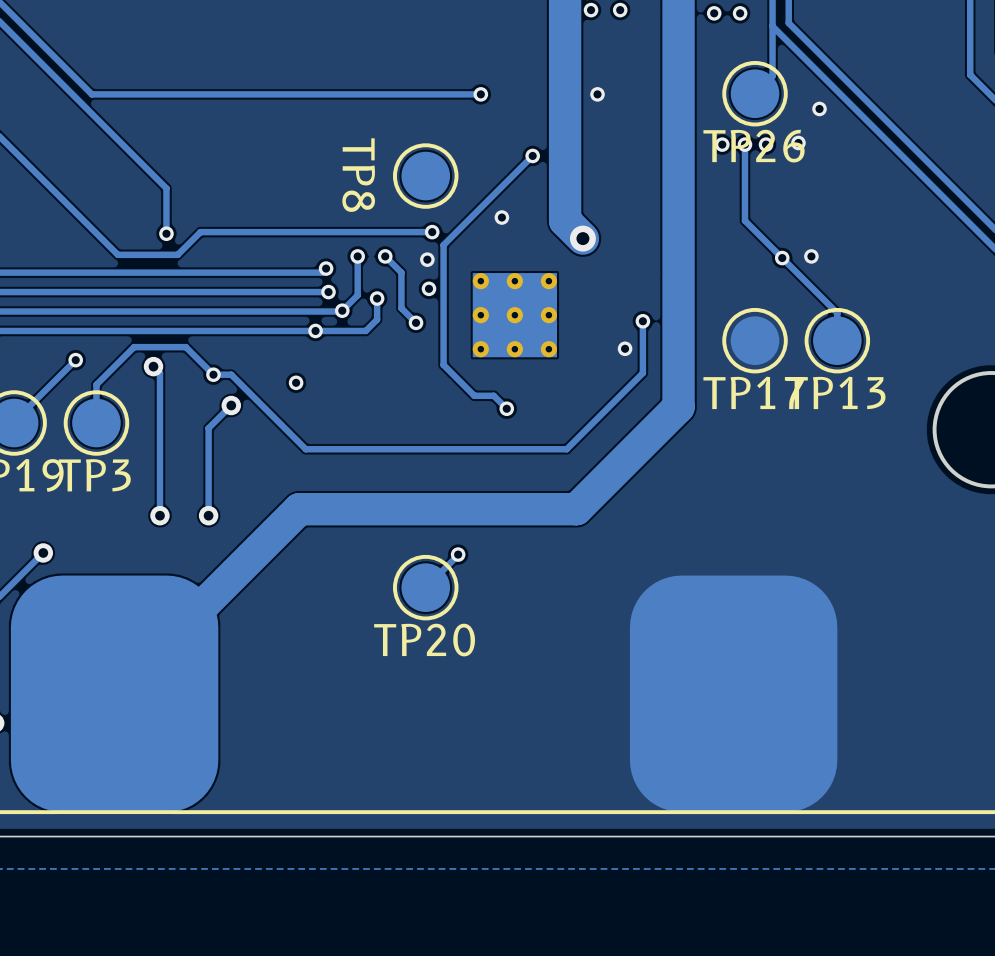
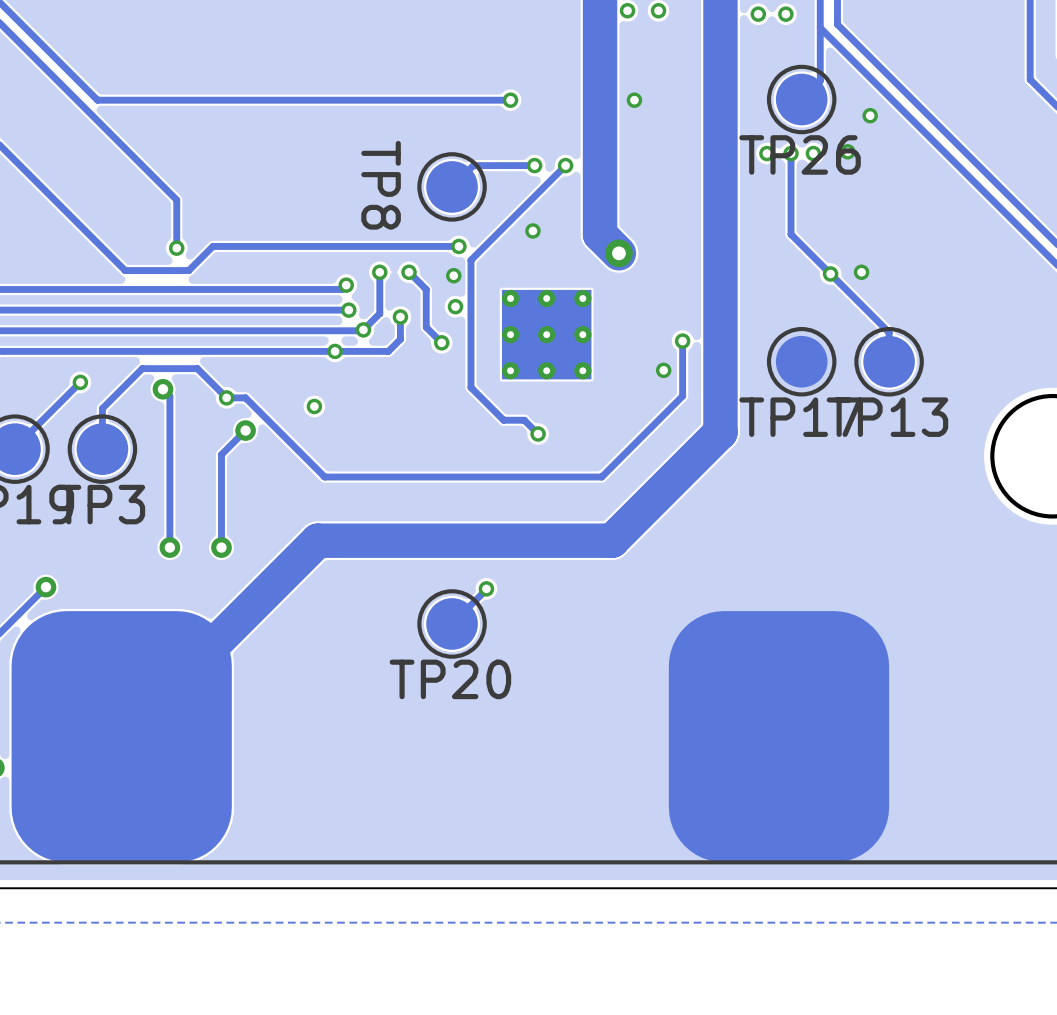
track: none -> (534, 165) (473, 165) (452, 186)
via: none -> (534, 165)

